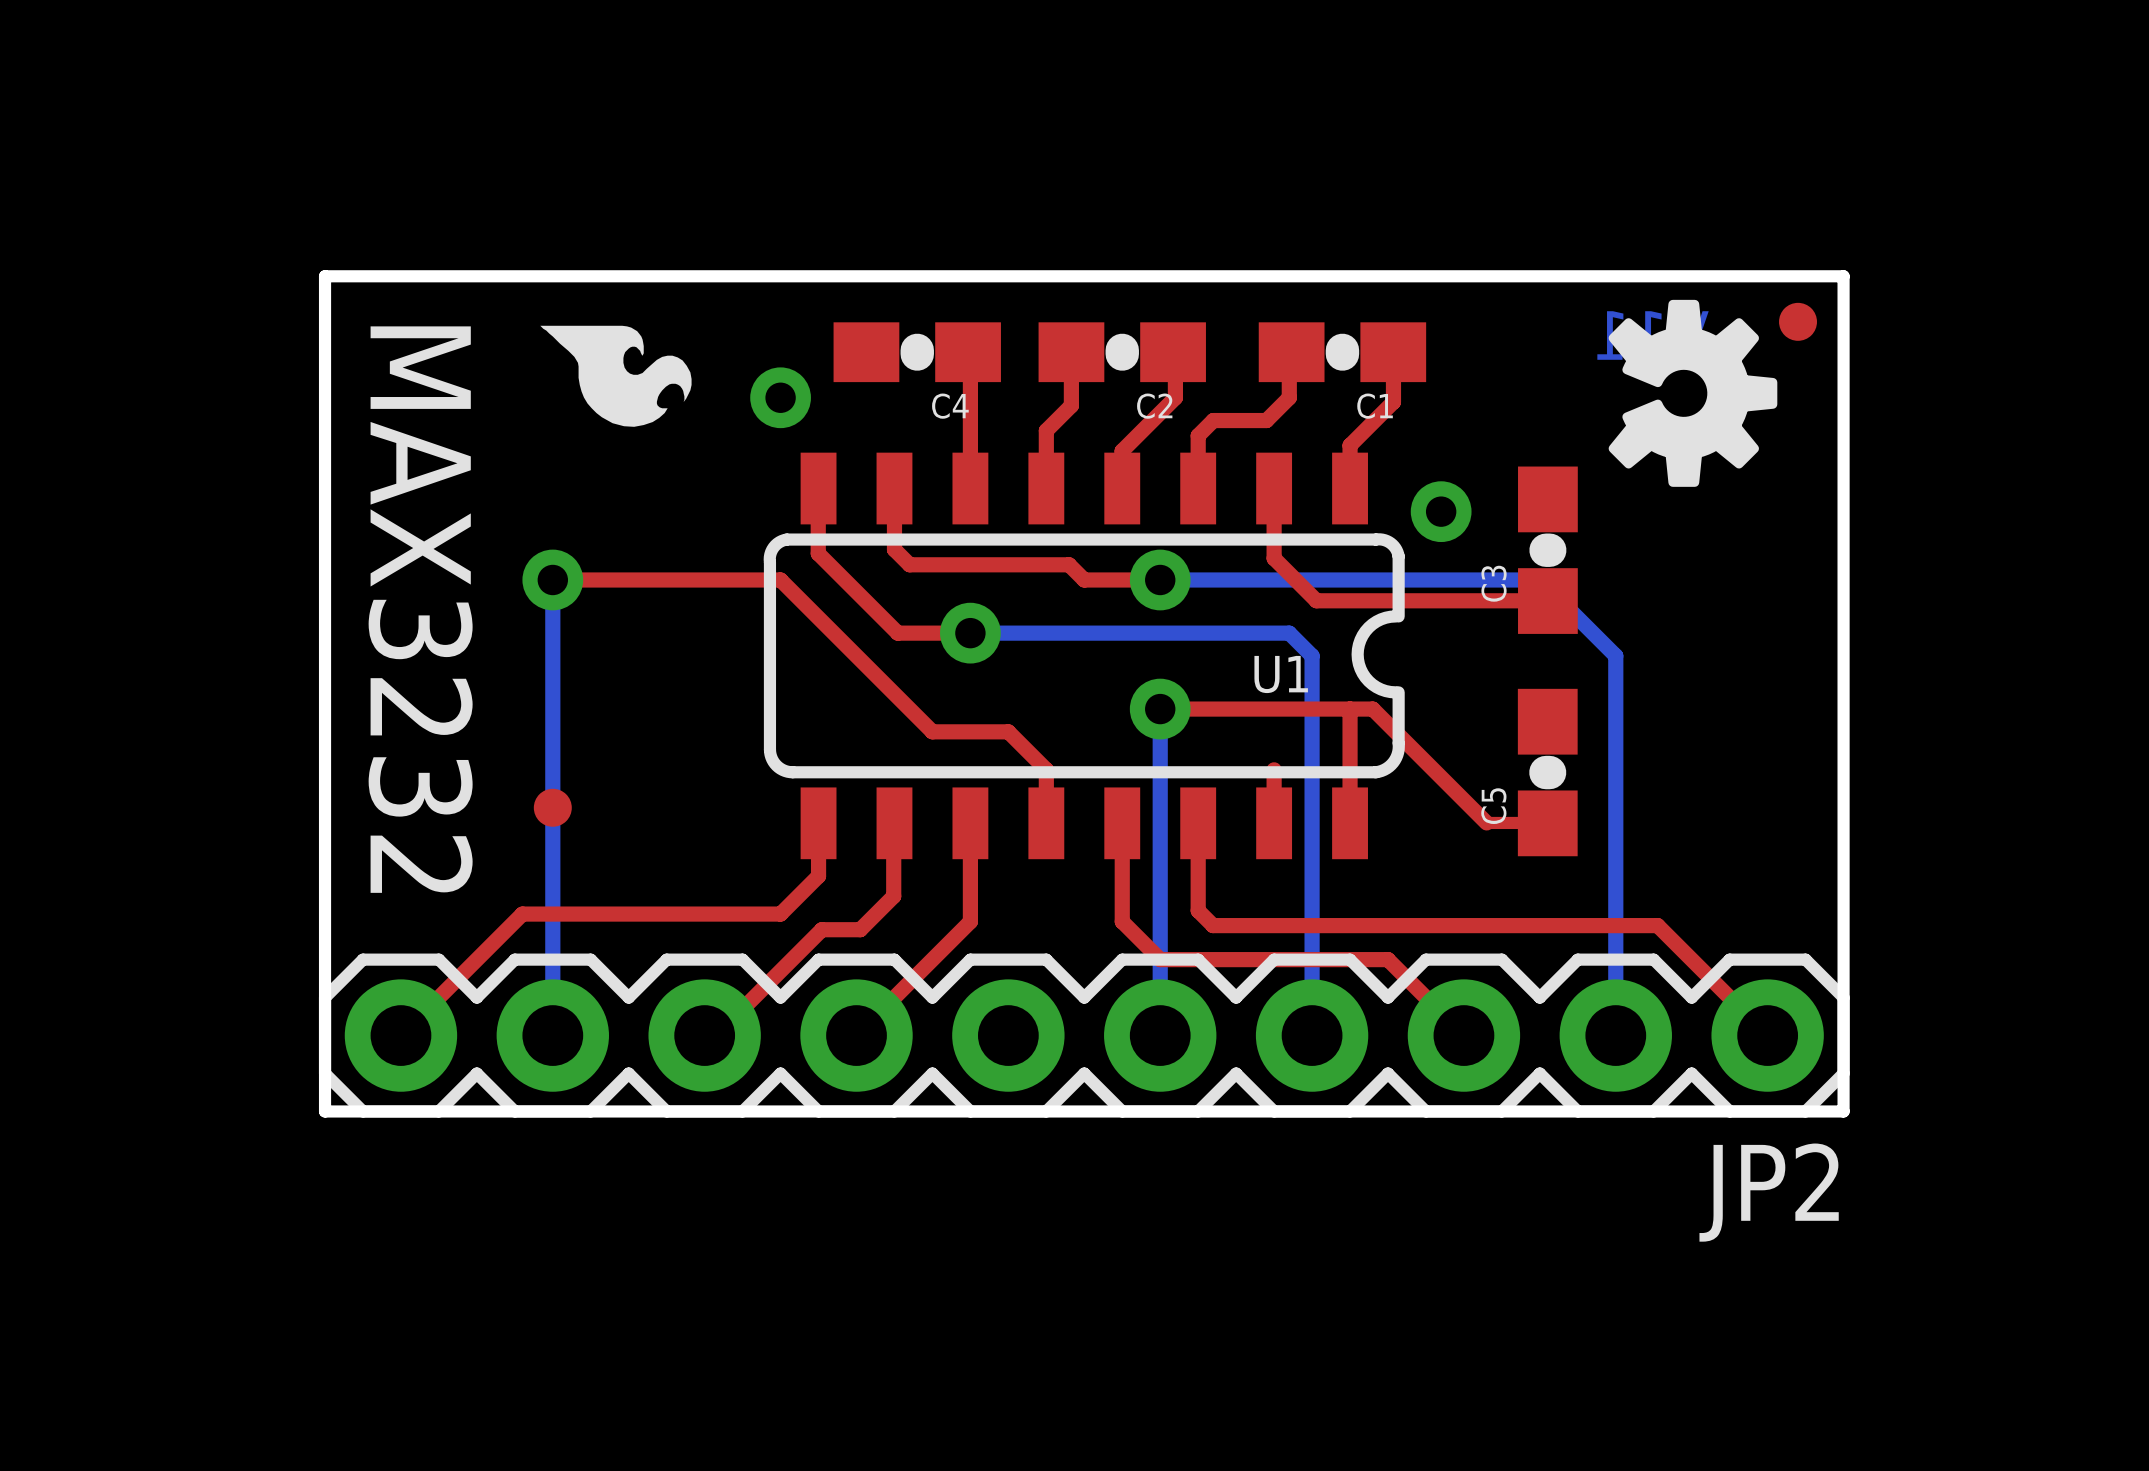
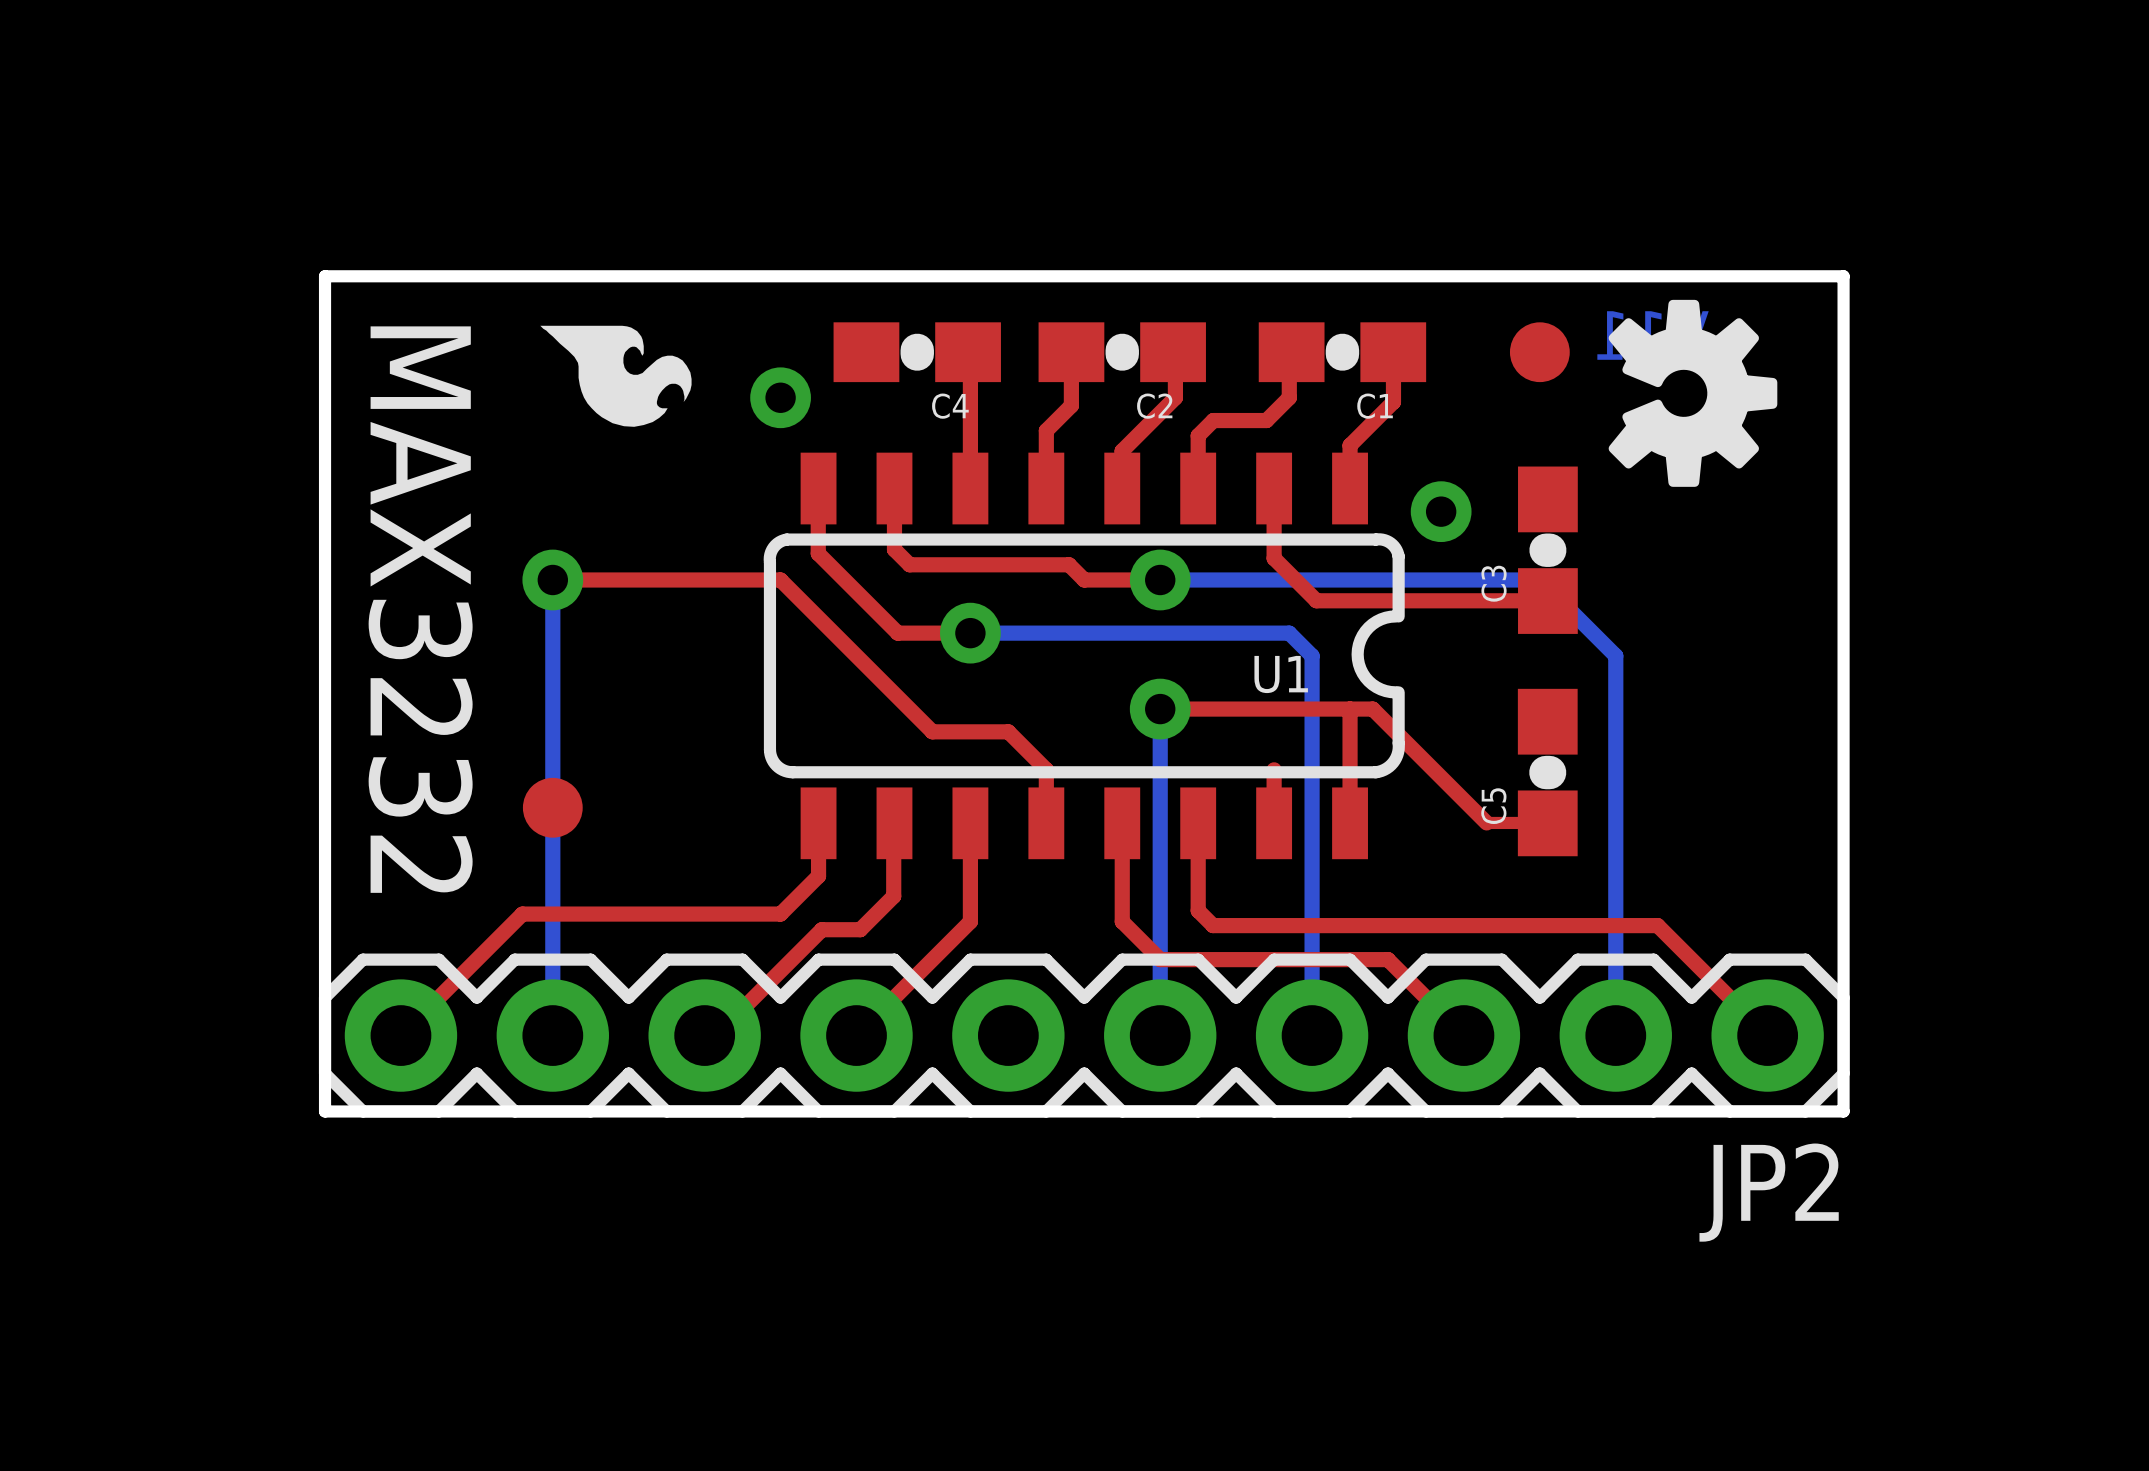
part: (1798, 321) -> none
part: none -> (1539, 352)
part footprint: [533, 788, 572, 827] -> [522, 777, 583, 838]

